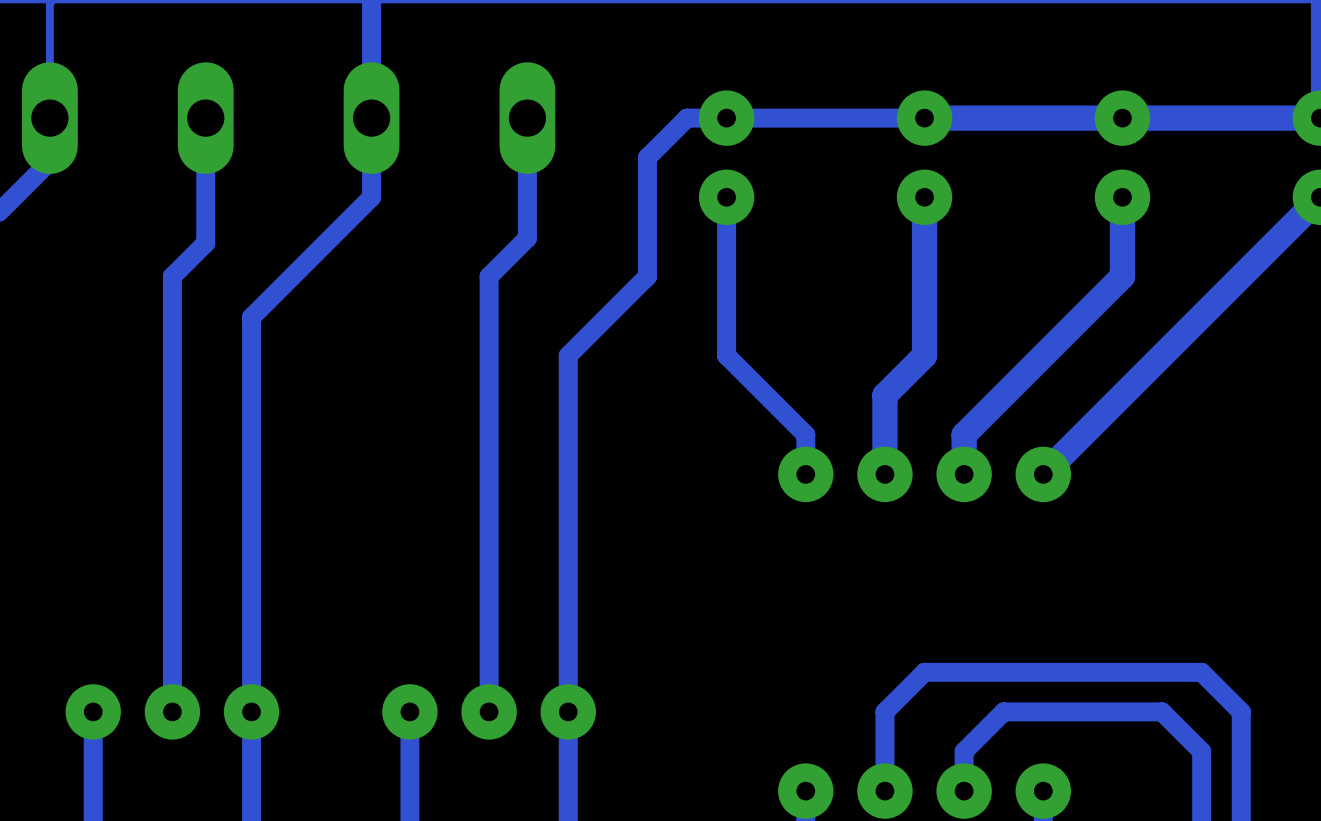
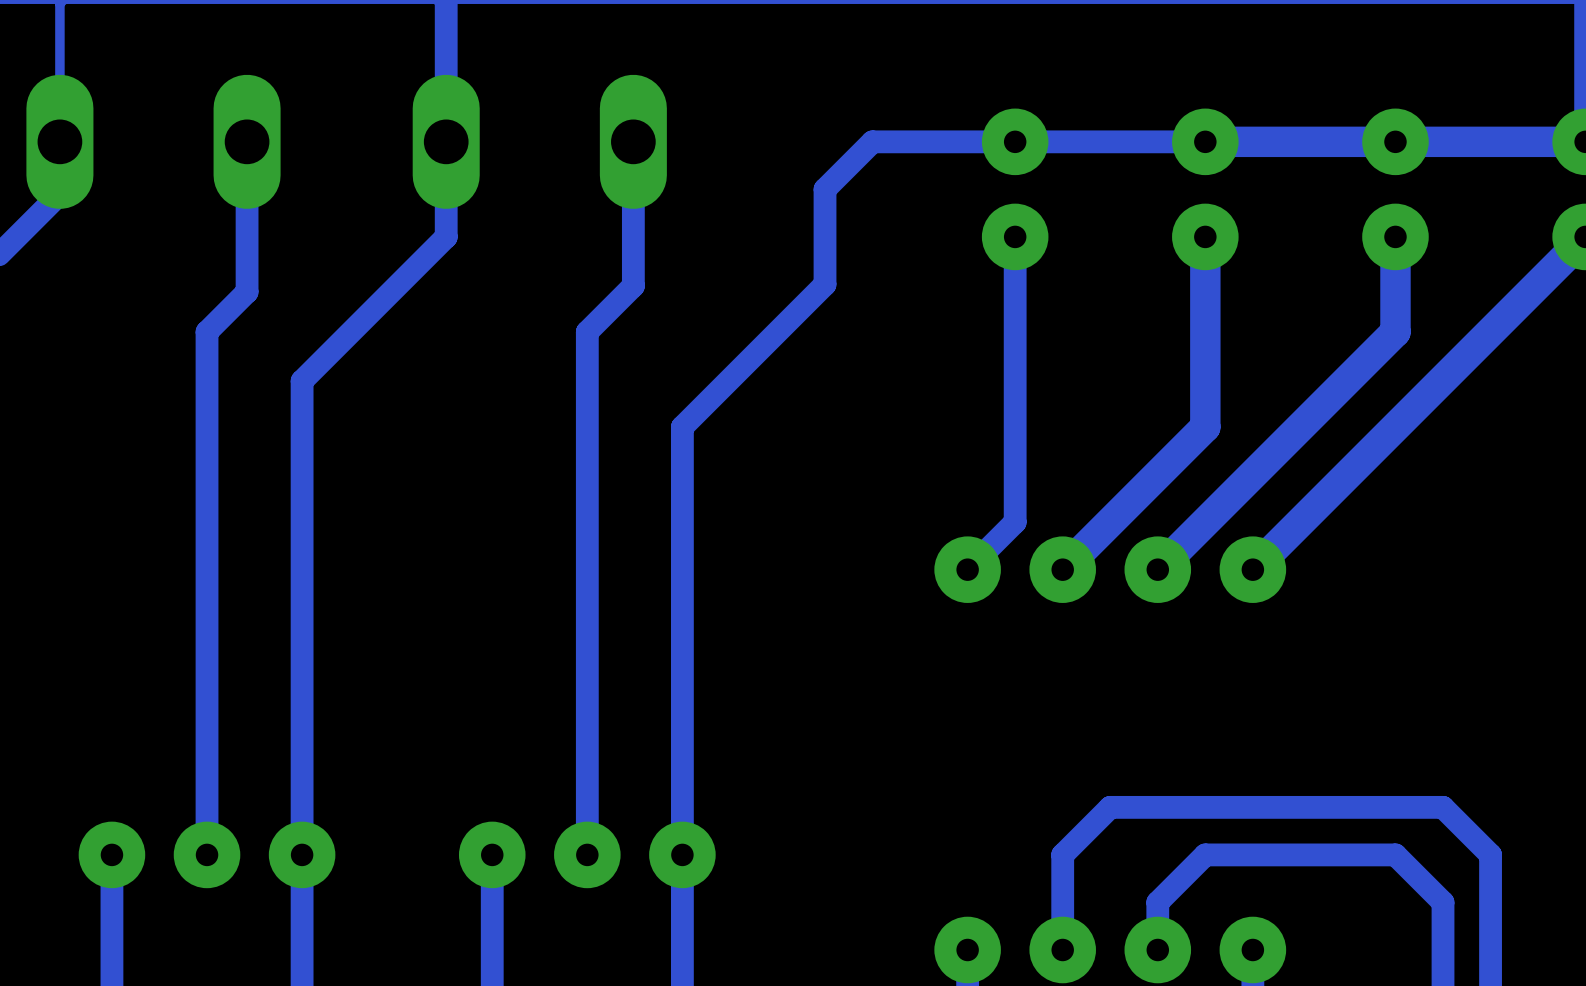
track: (726, 118) (687, 118) (647, 157) (647, 276) -> (872, 141) (825, 189) (825, 284) (777, 331)
track width: thick (1003, 118) (924, 118) -> thin (1205, 141) (1110, 141)
part: (726, 157) -> none
part: none -> (1015, 189)
part: (924, 157) -> none
part: none -> (1205, 189)
part position: (1122, 157) -> (1395, 189)
track: (726, 197) (726, 355) (805, 434) (805, 474) -> (1015, 236) (1015, 522) (967, 569)
track: (924, 197) (924, 355) (884, 395) (884, 474) -> (1205, 236) (1205, 427) (1062, 569)
track: (1122, 197) (1122, 276) (964, 434) (964, 474) -> (1395, 236) (1395, 331) (1157, 569)

